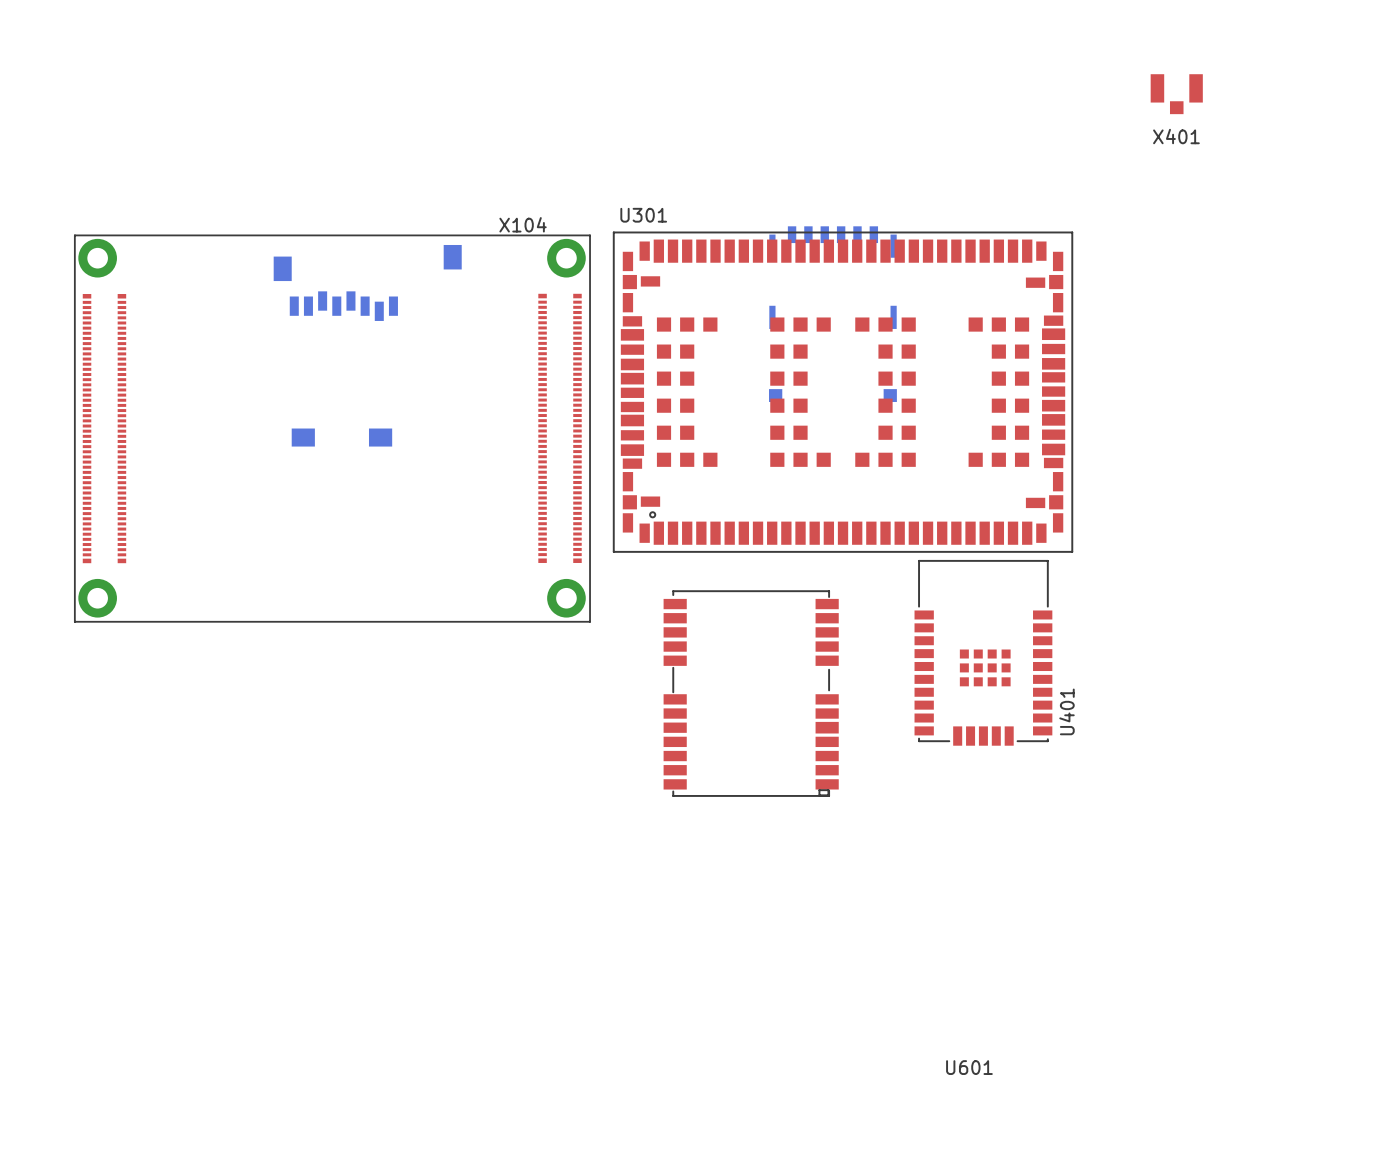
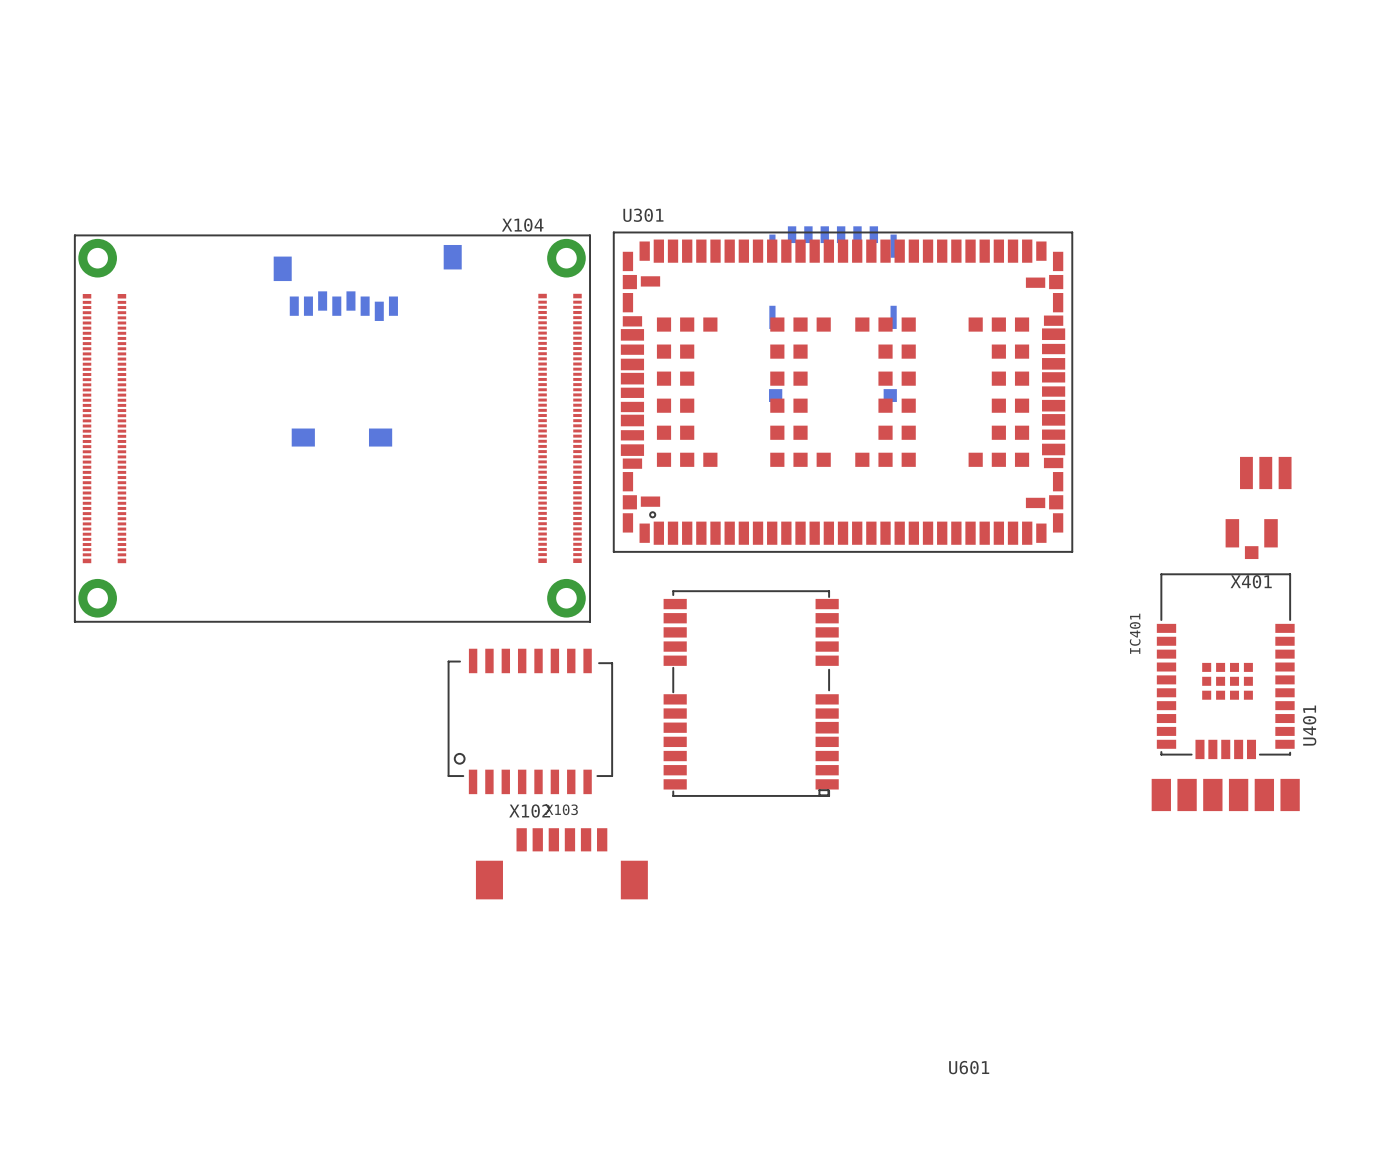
X401 position: (1176, 94) -> (1251, 539)
IC401: none -> (1225, 633)
U401 position: (983, 652) -> (1225, 666)
X102: none -> (530, 721)
X103: none -> (561, 863)

